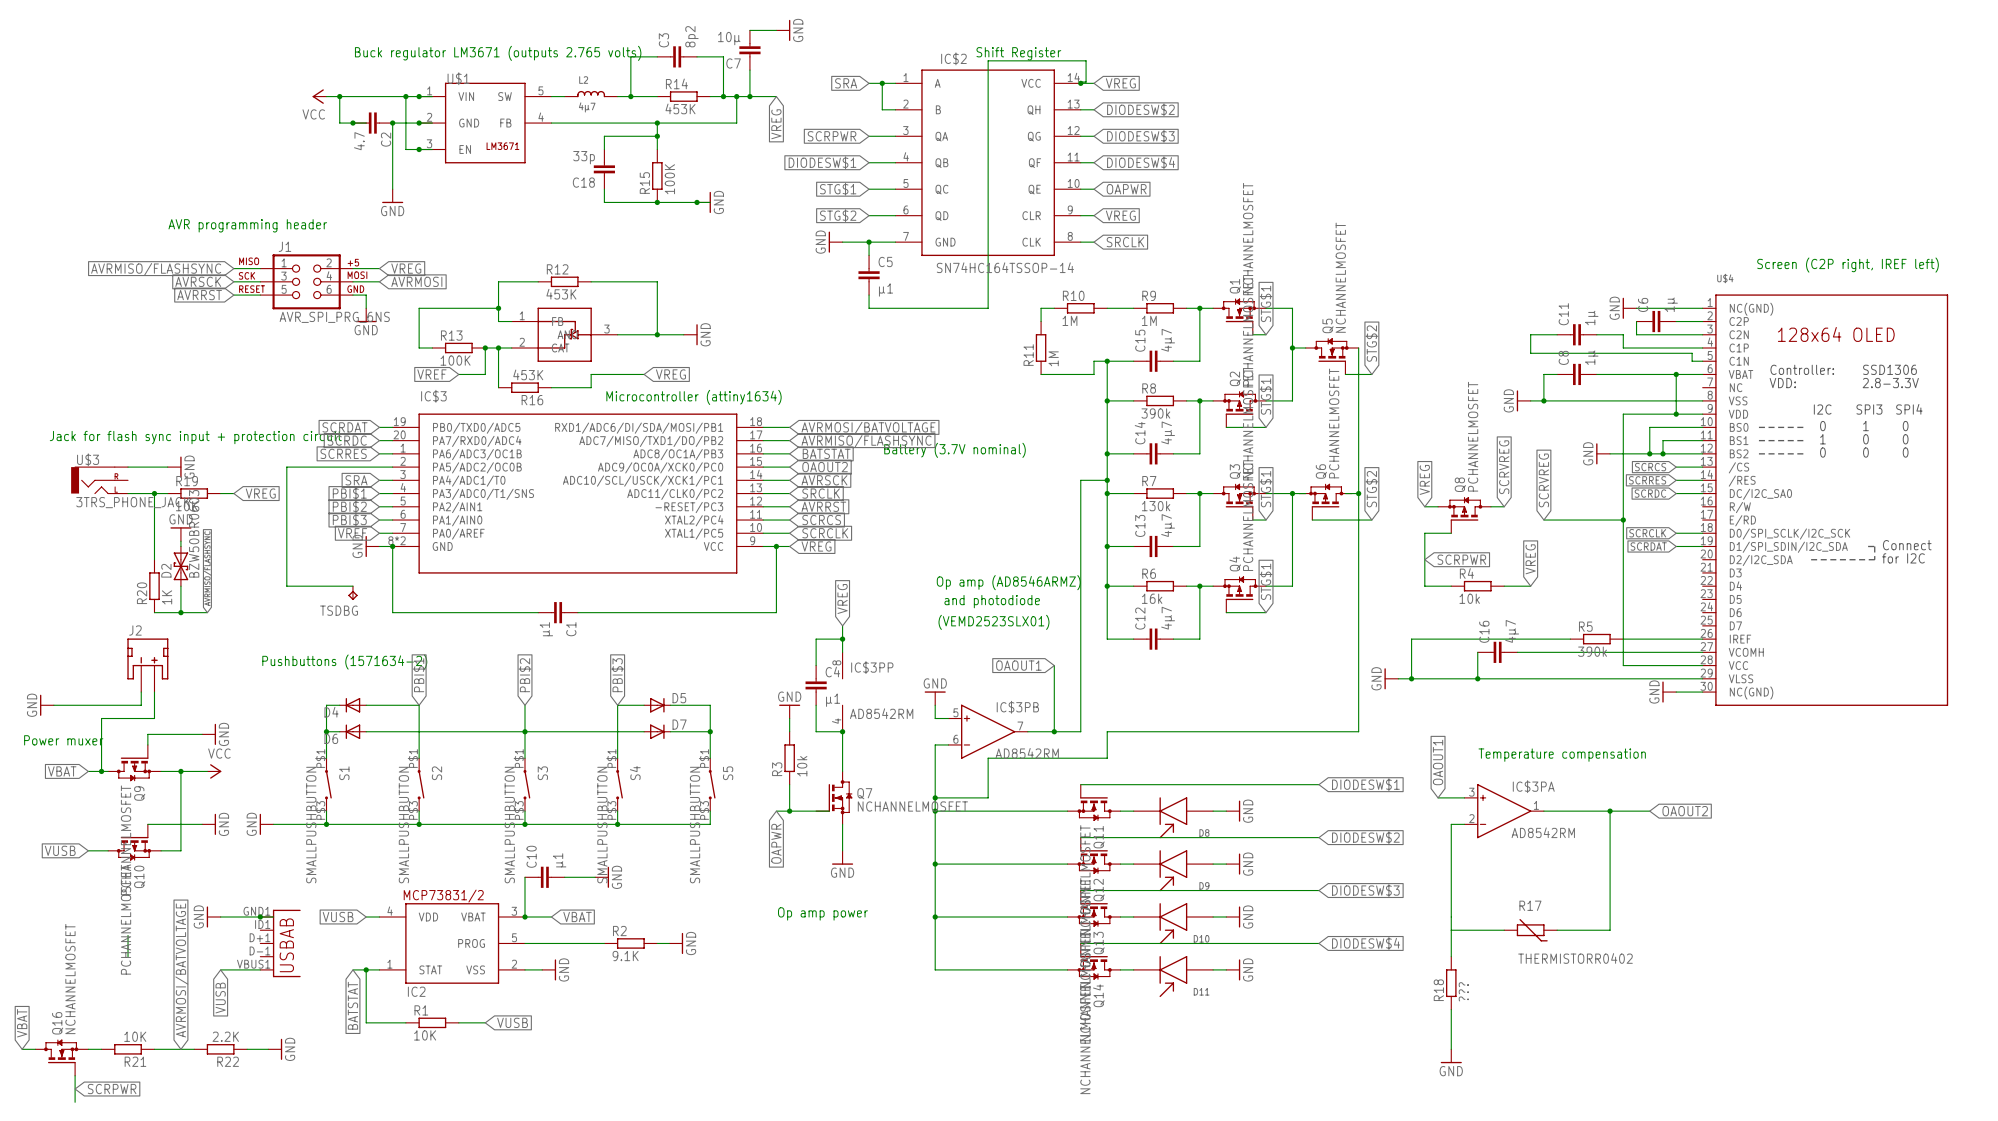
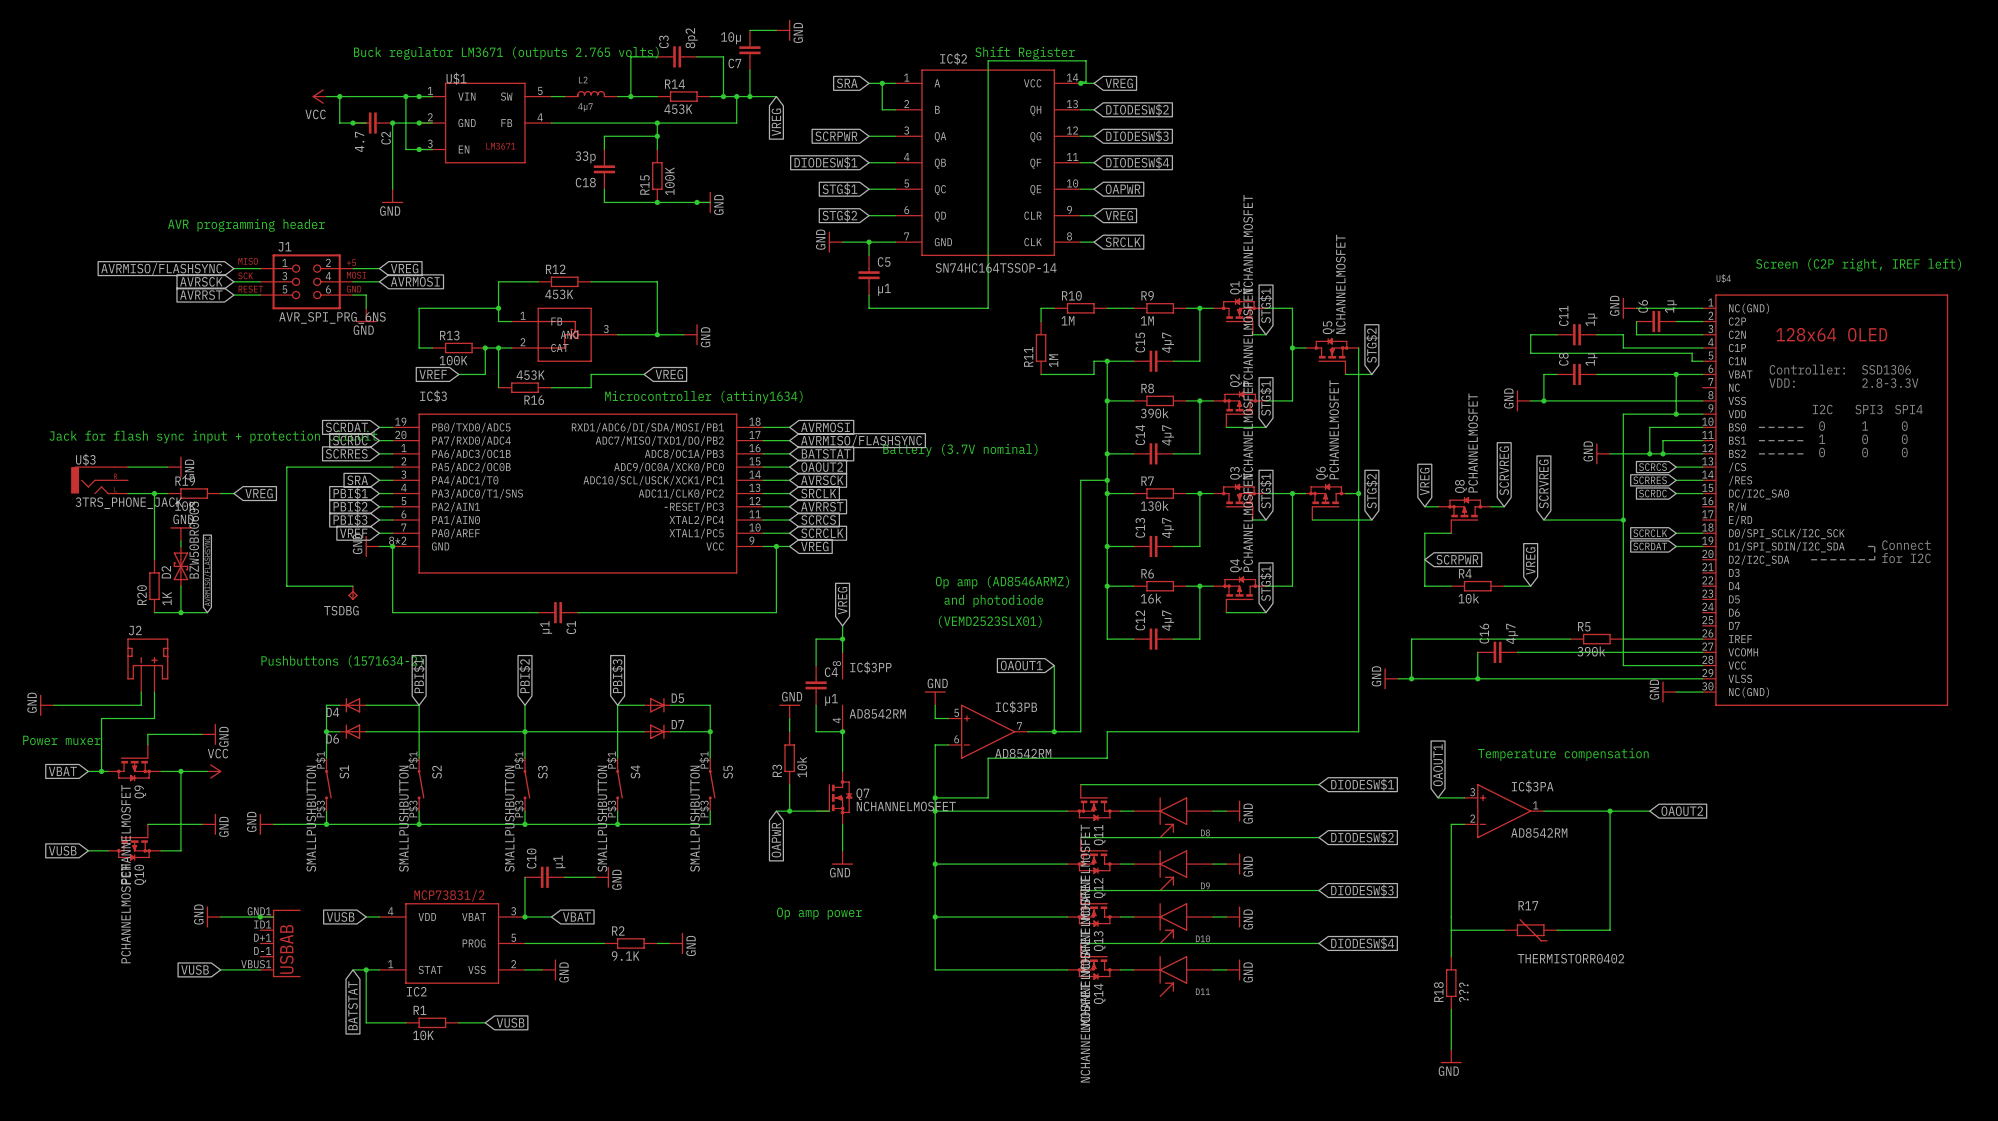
global label: AVRMOSI/BATVOLTAGE (868, 428) -> AVRMOSI (825, 427)
wire: (128, 935) (128, 956) -> none
global label: AVRMOSI/BATVOLTAGE (181, 970) -> none
global label rotation: 0° (220, 998) -> 90° clockwise (195, 969)
global label: VBAT (22, 1023) -> none
wire: (22, 1049) (35, 1049) -> none
wire: (88, 1049) (101, 1049) -> none
R21: 10K (128, 1049) -> none
wire: (154, 1049) (194, 1049) -> none
R22: 2.2K (220, 1049) -> none
wire: (247, 1049) (268, 1049) -> none
power symbol: GND (275, 1049) -> none
Q16: NCHANNELMOSFET (61, 1057) -> none
wire: (75, 1075) (75, 1102) -> none
global label: SCRPWR (112, 1089) -> none

